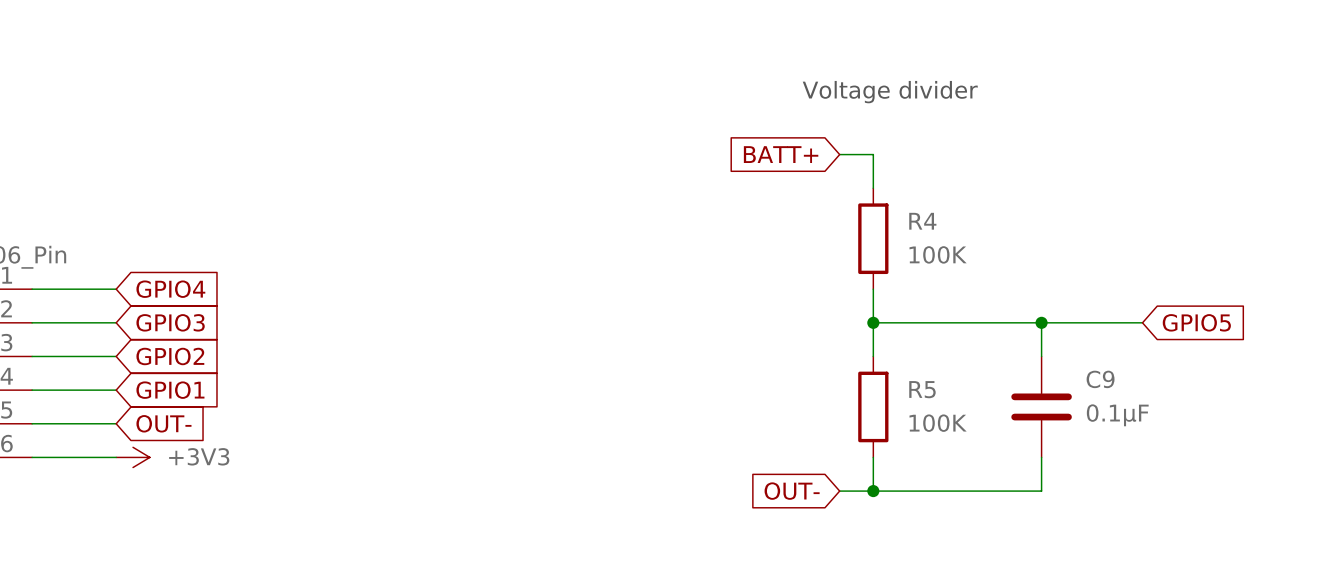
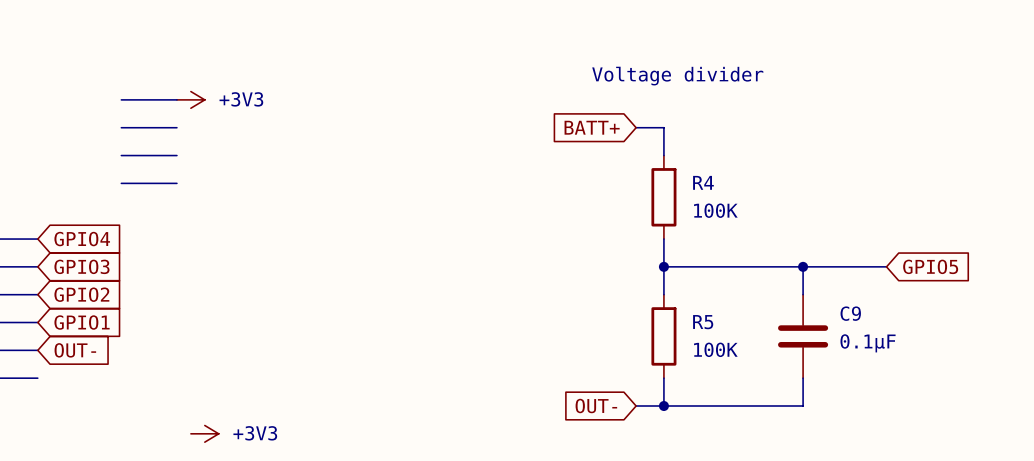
wire: none -> (121, 99) (176, 99)
power symbol: none -> +3V3 (190, 99)
wire: none -> (121, 127) (176, 127)
wire: none -> (121, 155) (176, 155)
wire: none -> (121, 183) (176, 183)
power symbol: +3V3 (133, 457) -> none
power symbol: none -> +3V3 (204, 433)

